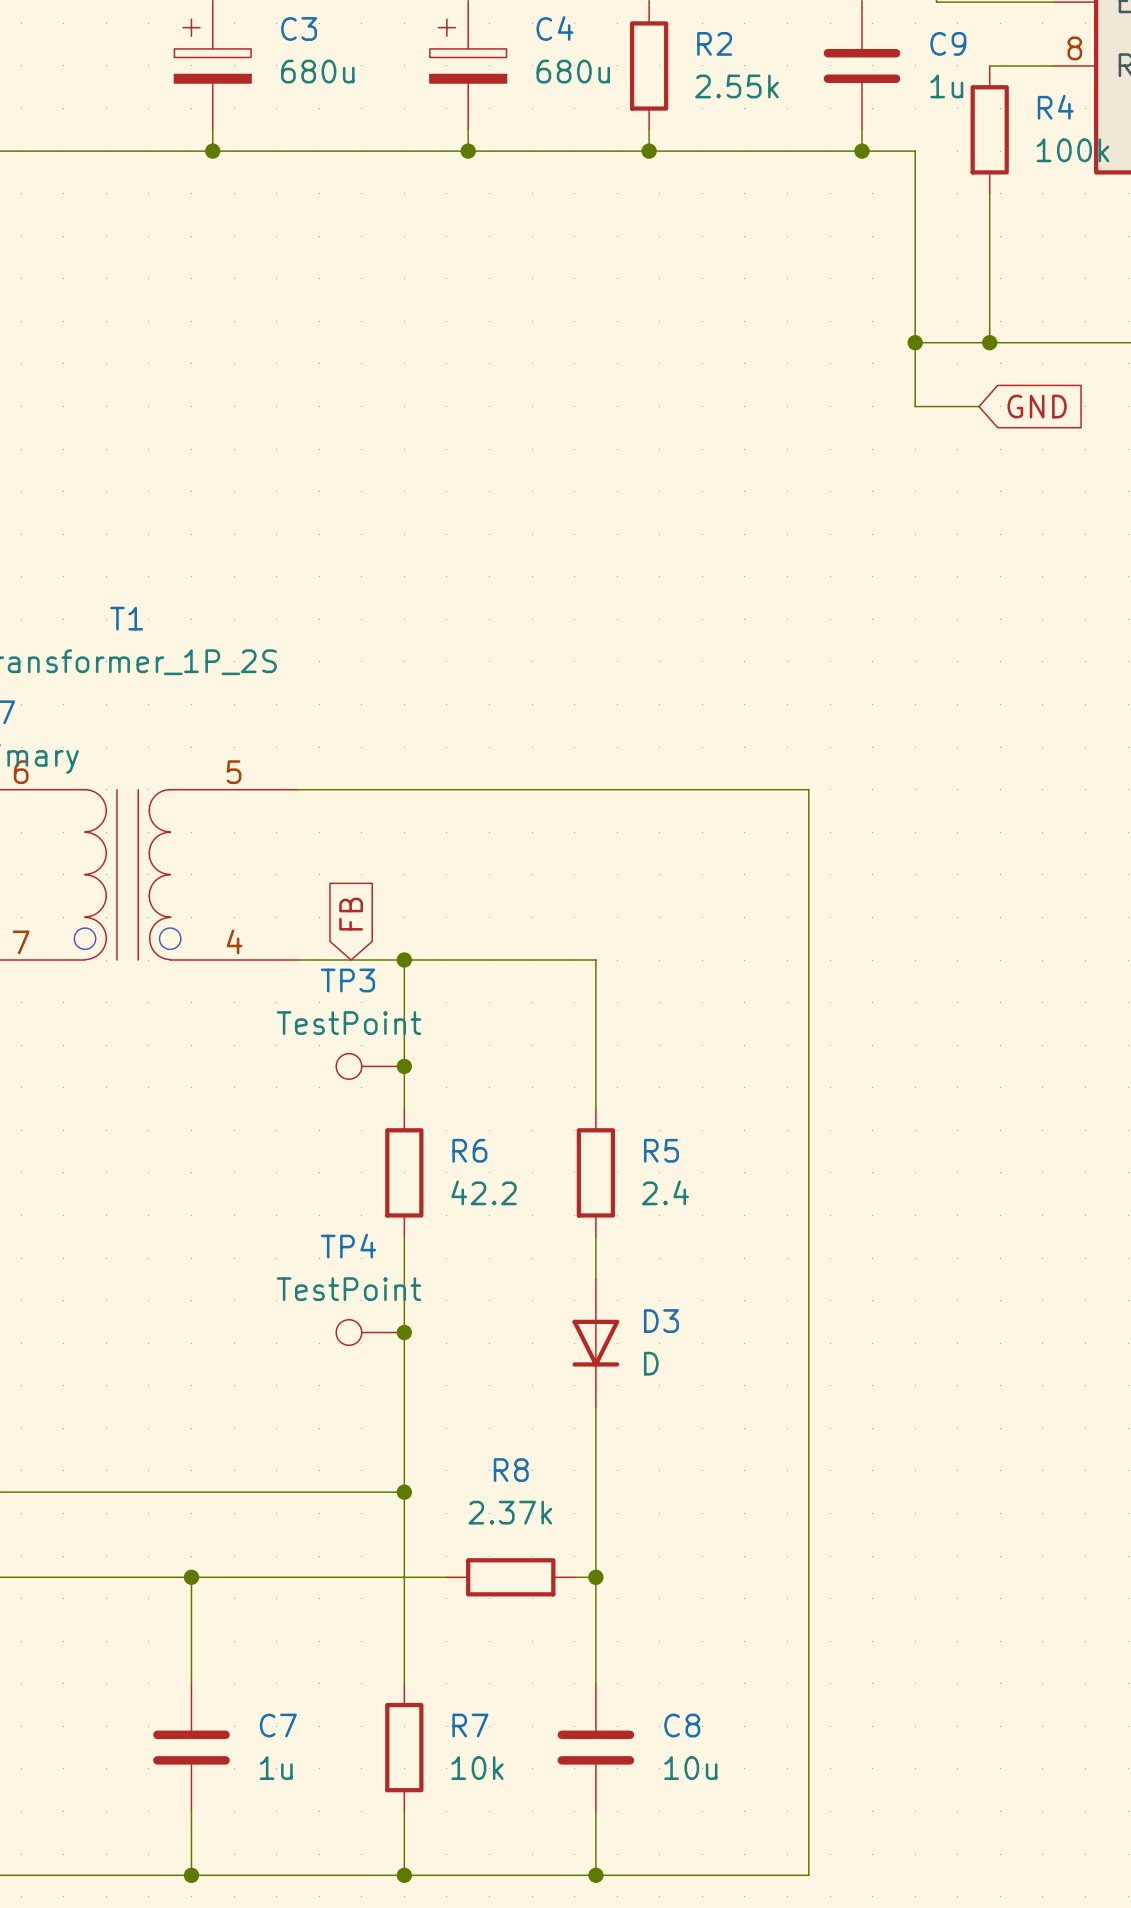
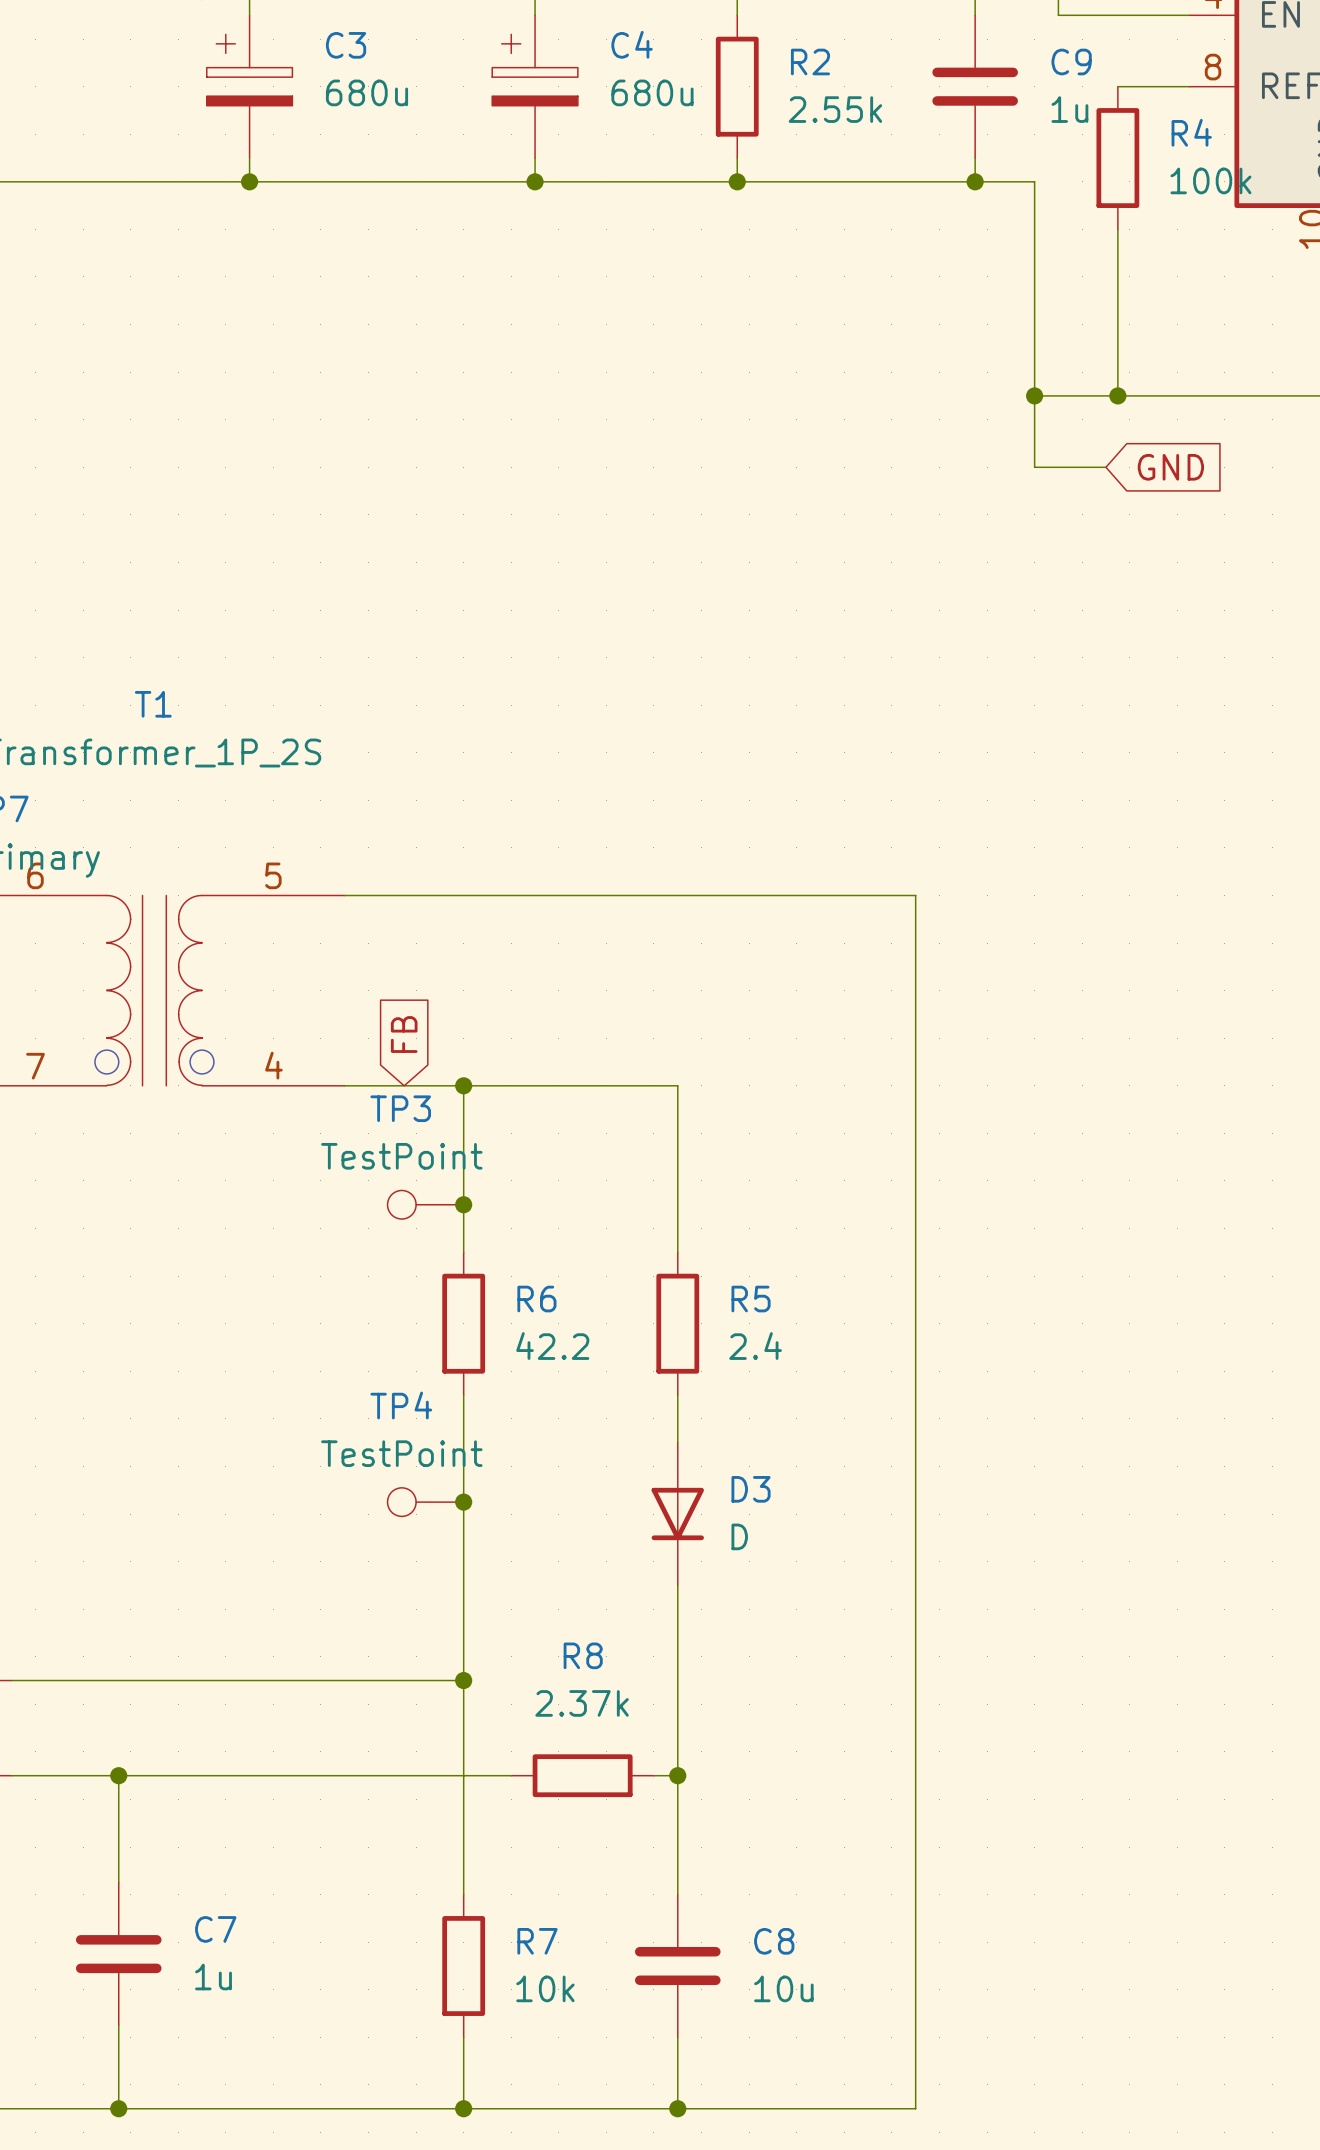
wire: none -> (118, 1775) (118, 1882)
wire: (191, 1577) (191, 1683) -> none
junction position: (191, 1577) -> (118, 1775)
C7 position: (191, 1747) -> (118, 1954)
wire: none -> (118, 2025) (118, 2108)
wire: (191, 1811) (191, 1875) -> none
junction position: (191, 1875) -> (118, 2108)

